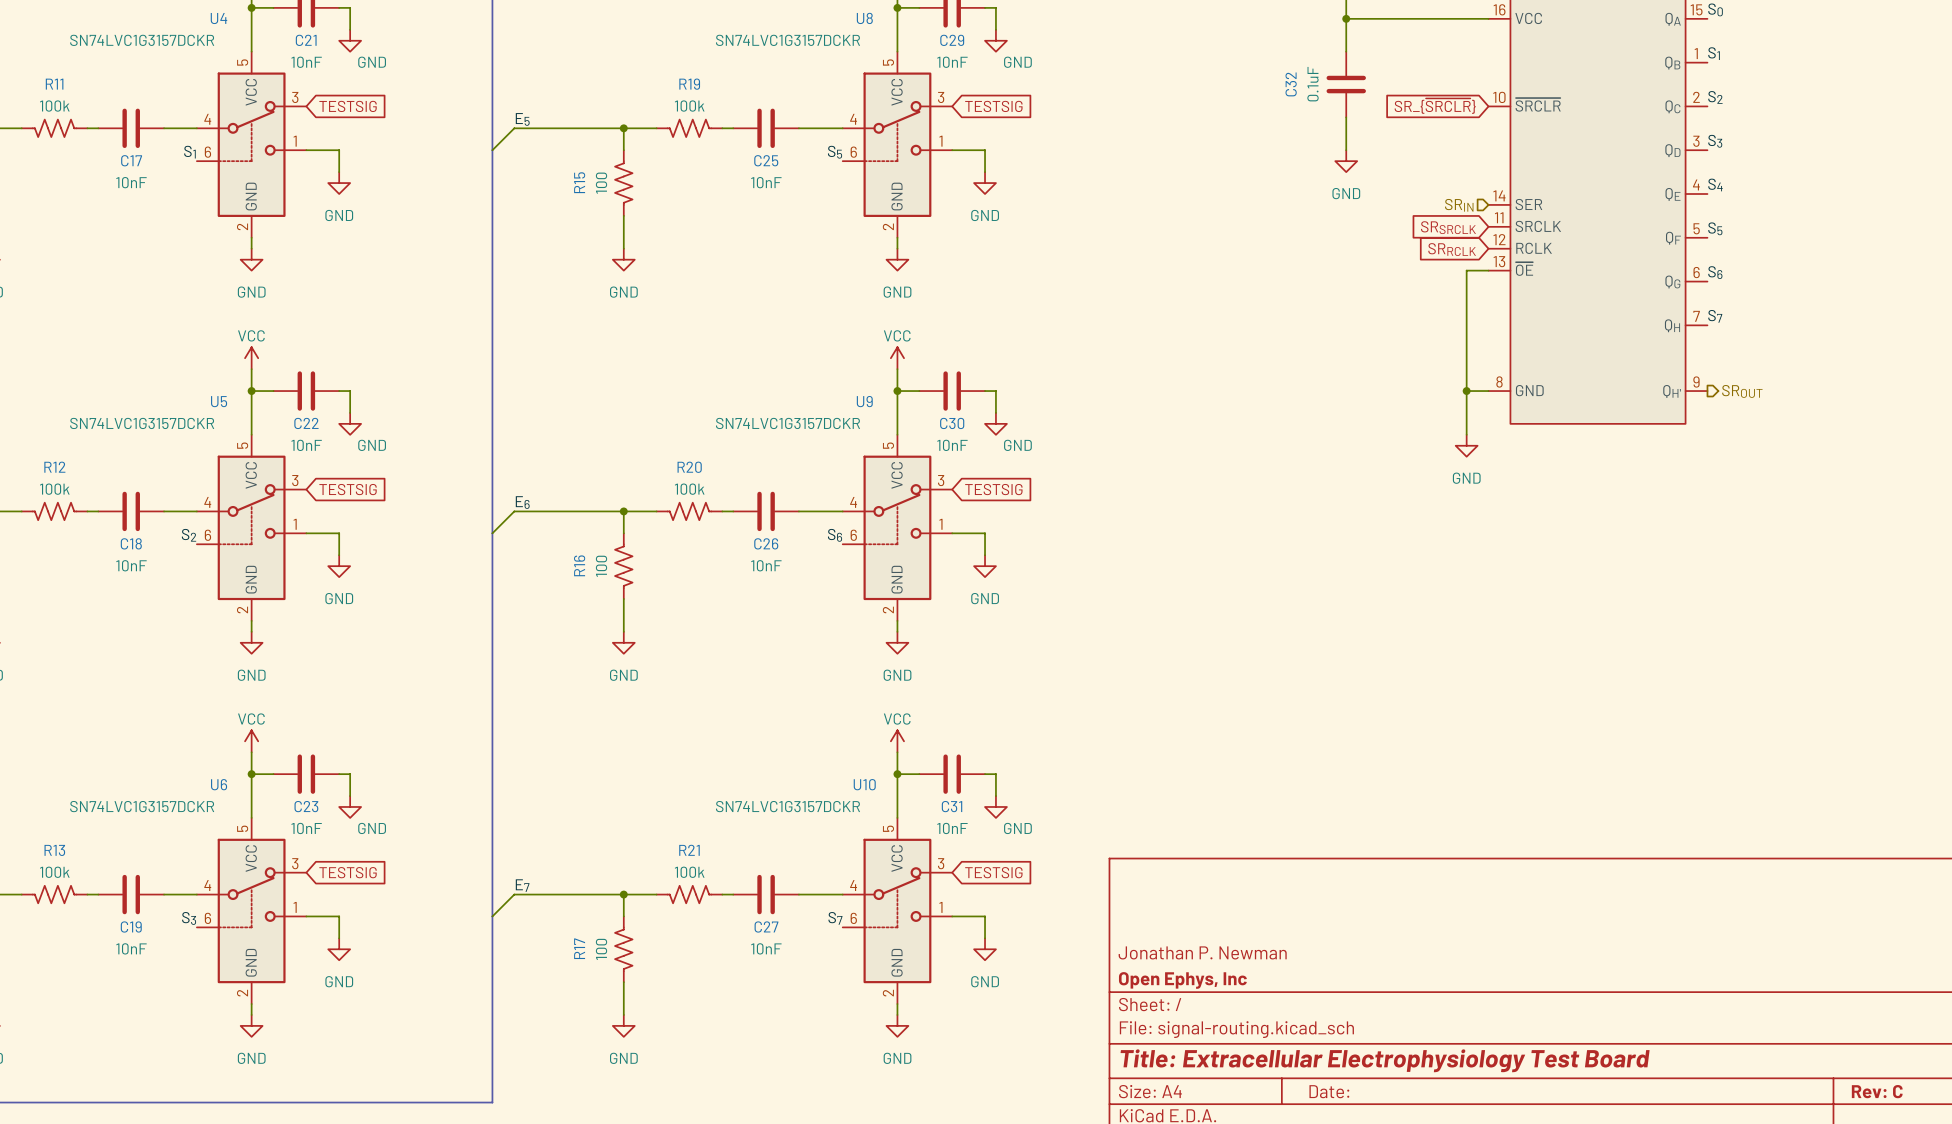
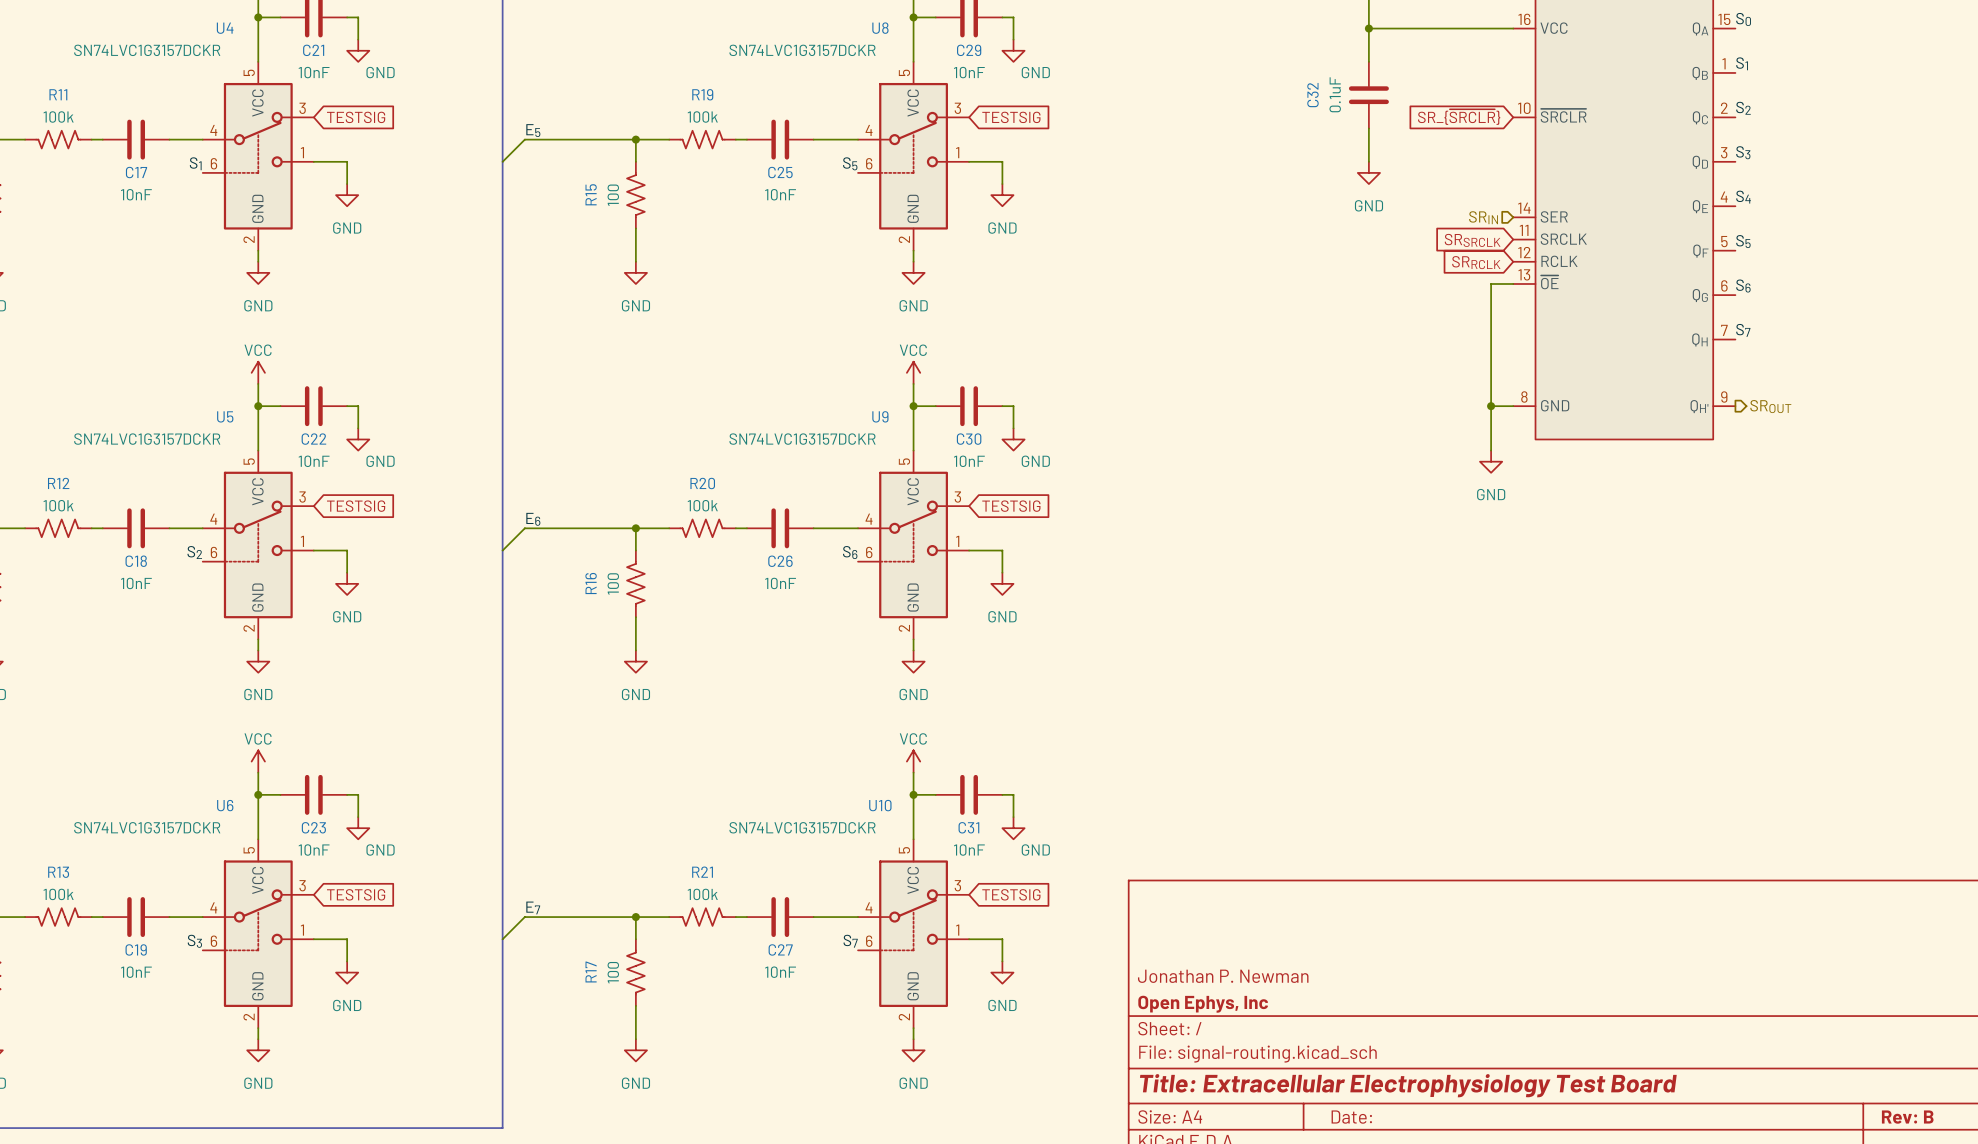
title block: Rev: C (1877, 1091) -> Rev: B (1907, 1117)

